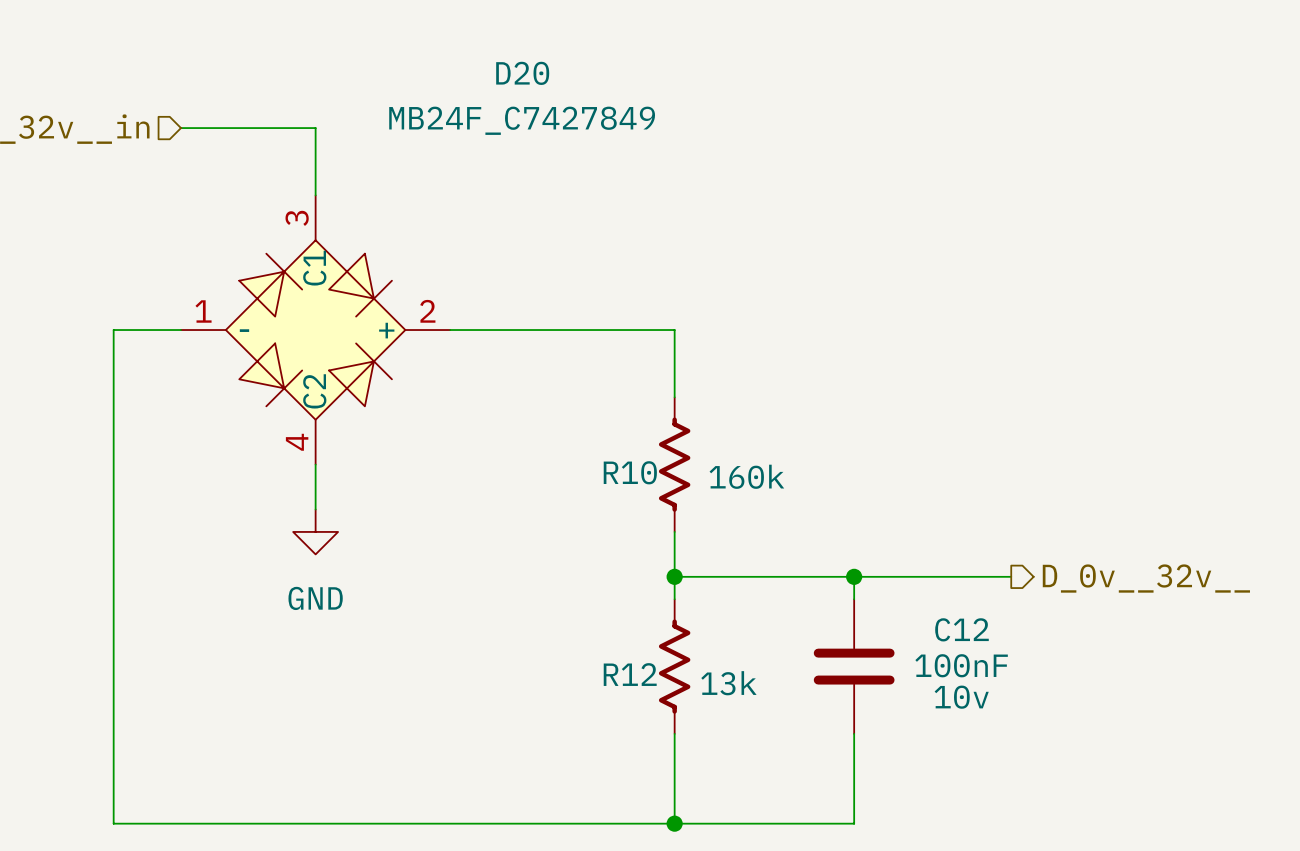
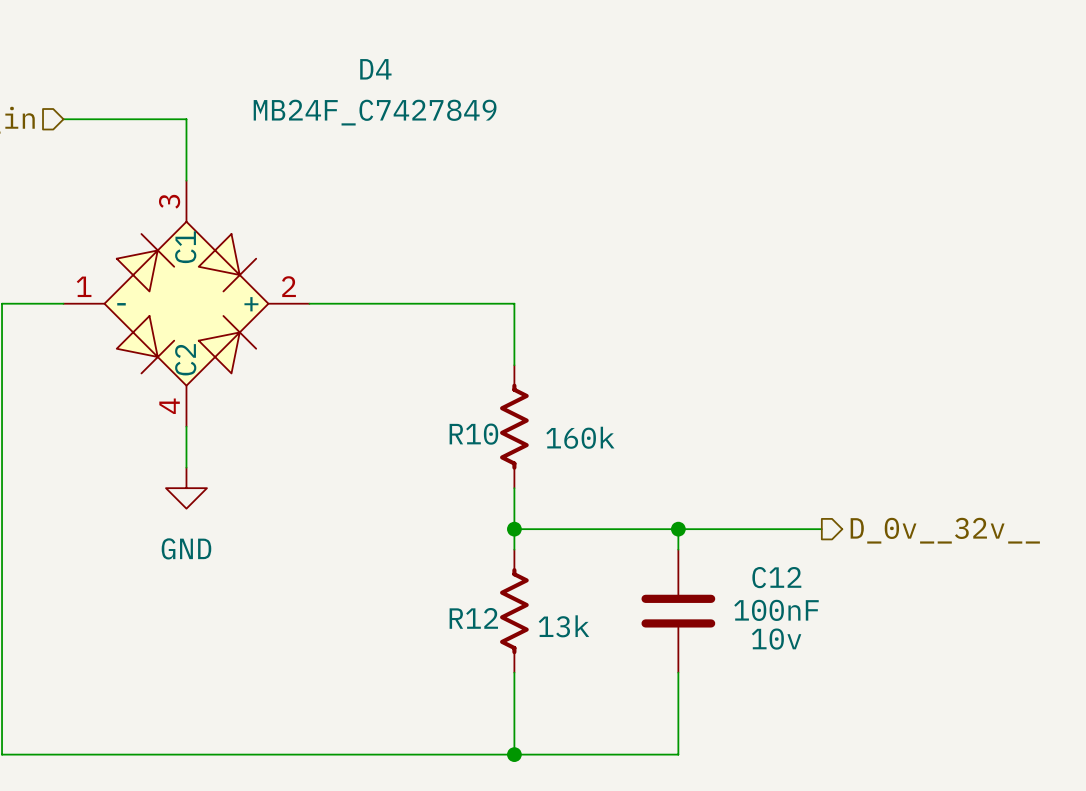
D20 name: D20 (522, 73) -> D4 (375, 69)

